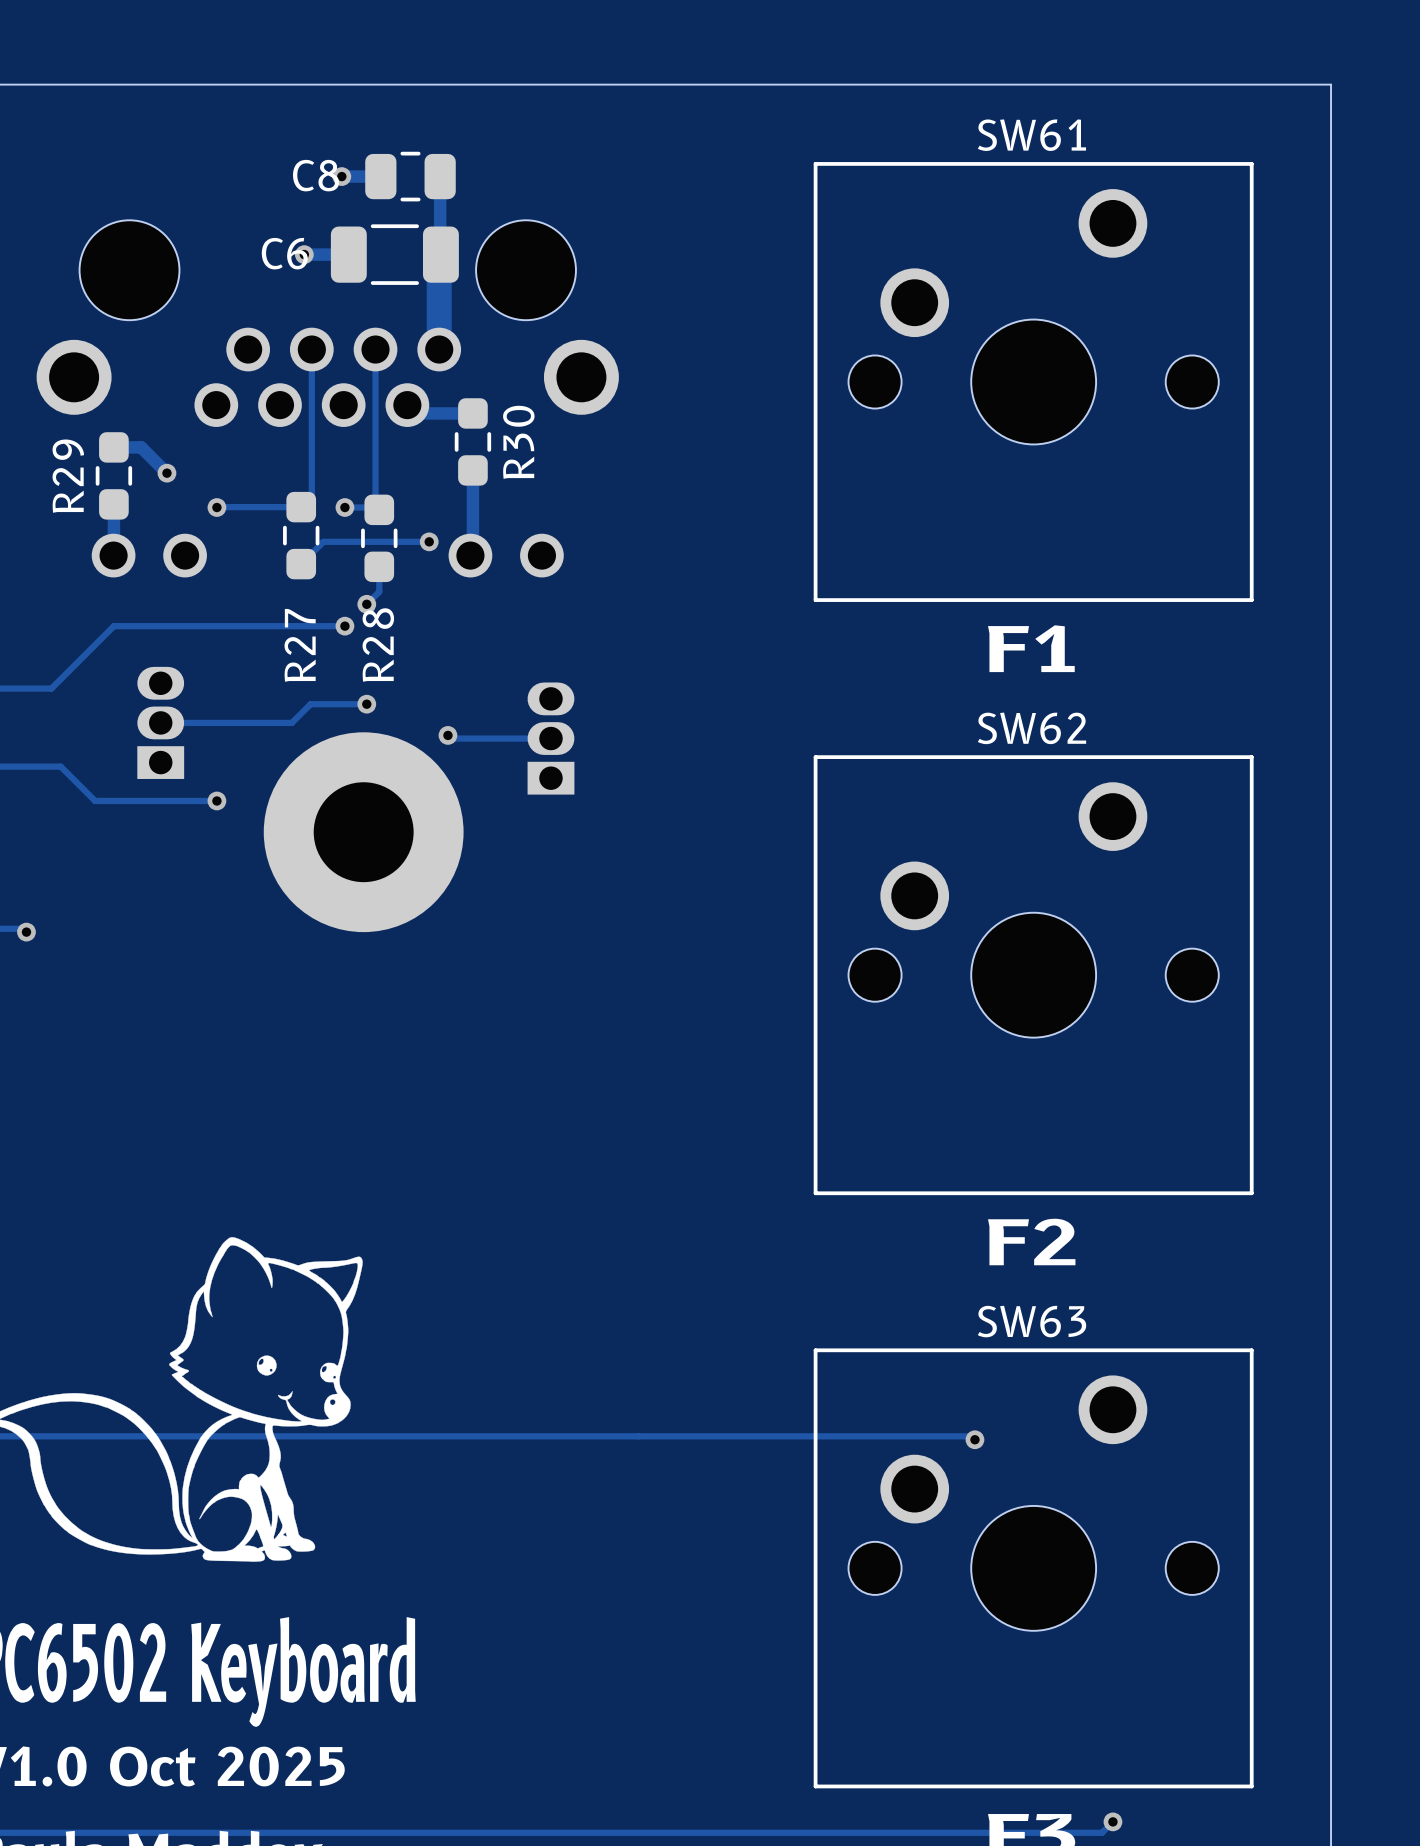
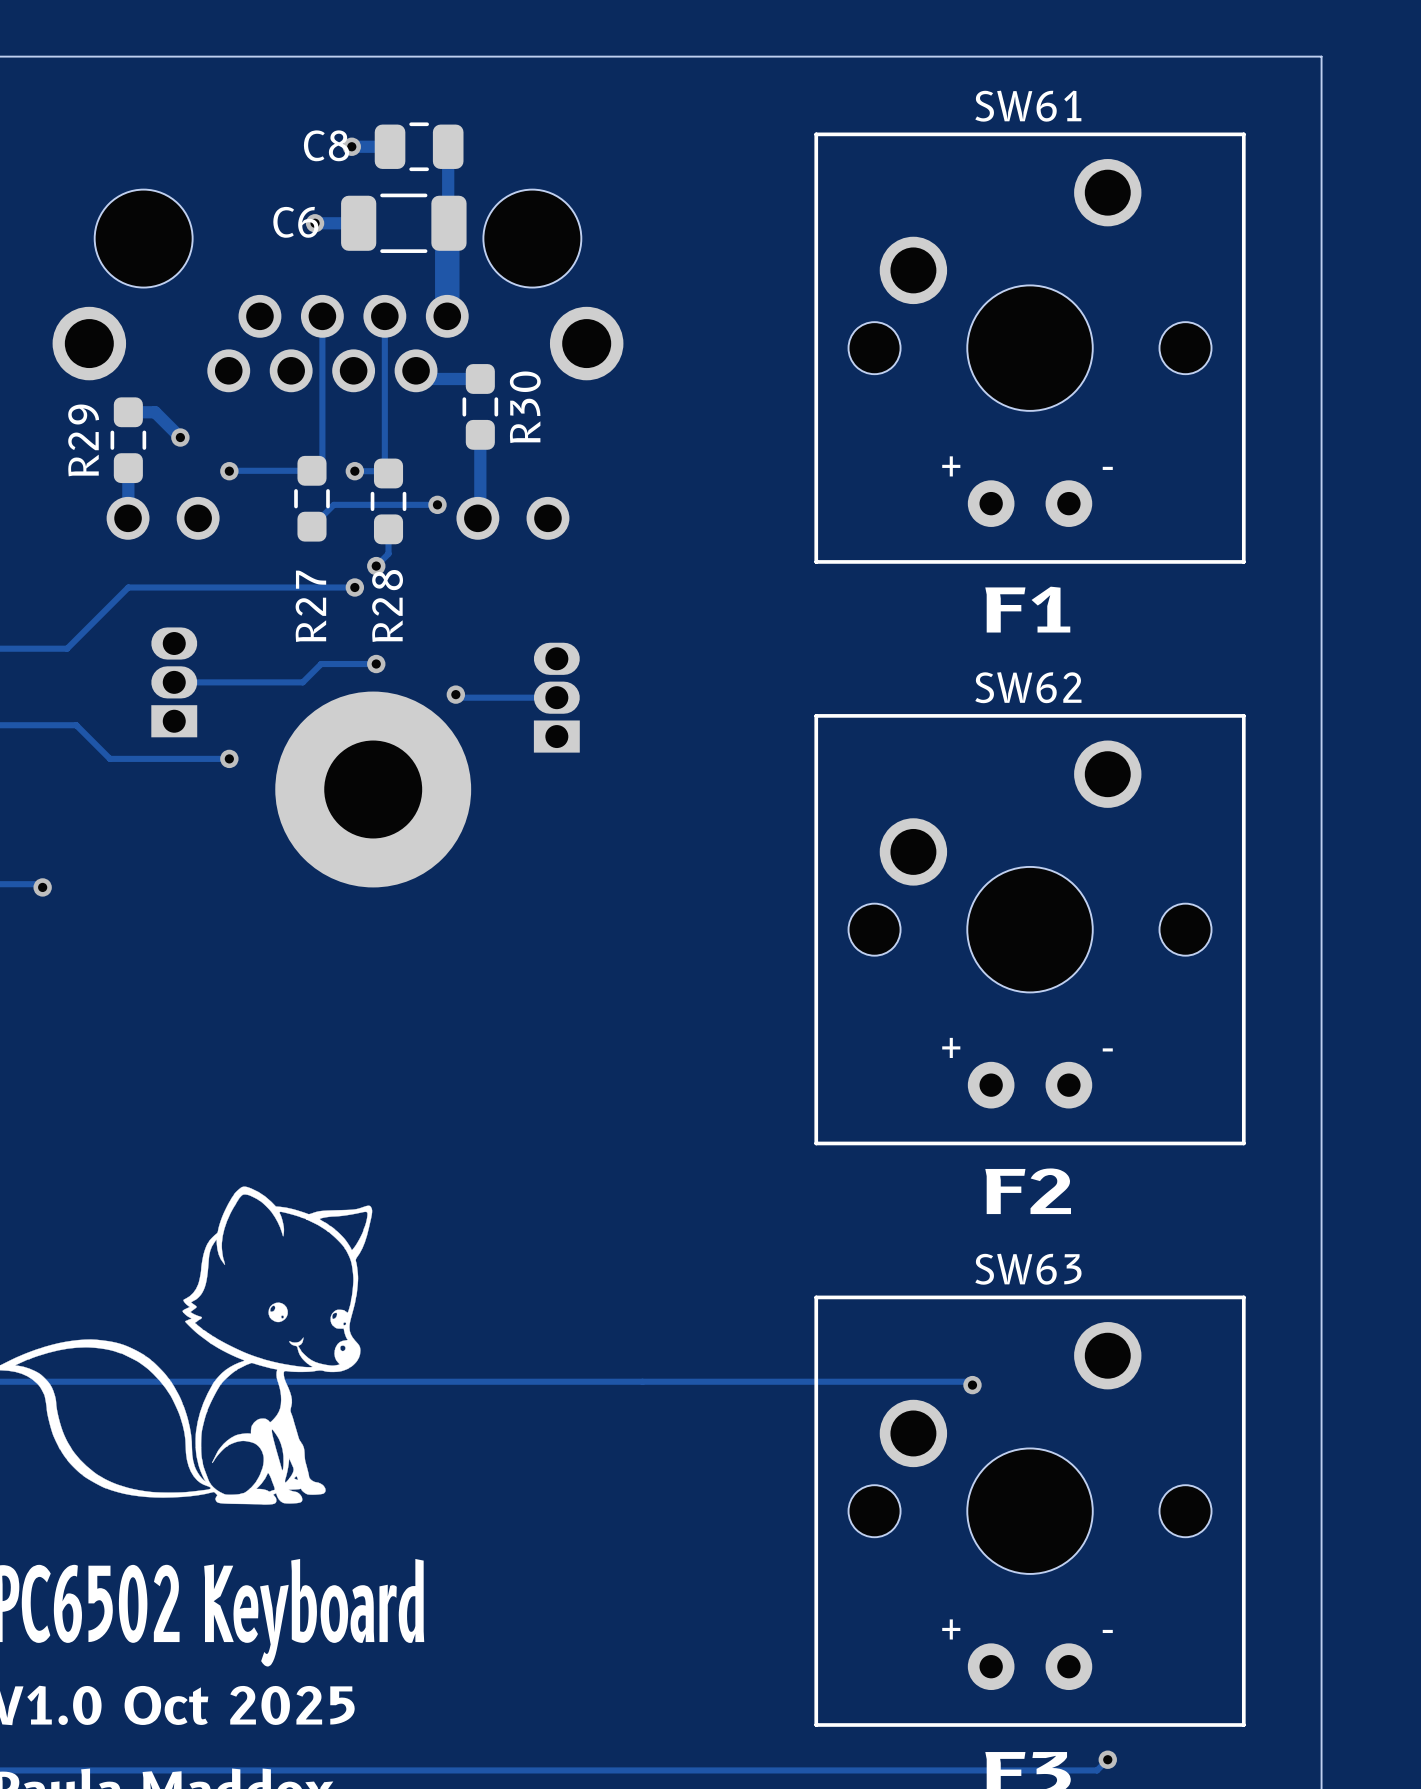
SW61 footprint: [813, 162, 1254, 602] -> [814, 132, 1246, 564]
SW62 footprint: [813, 755, 1254, 1196] -> [814, 714, 1246, 1146]
SW63 footprint: [813, 1348, 1254, 1789] -> [814, 1295, 1246, 1727]

